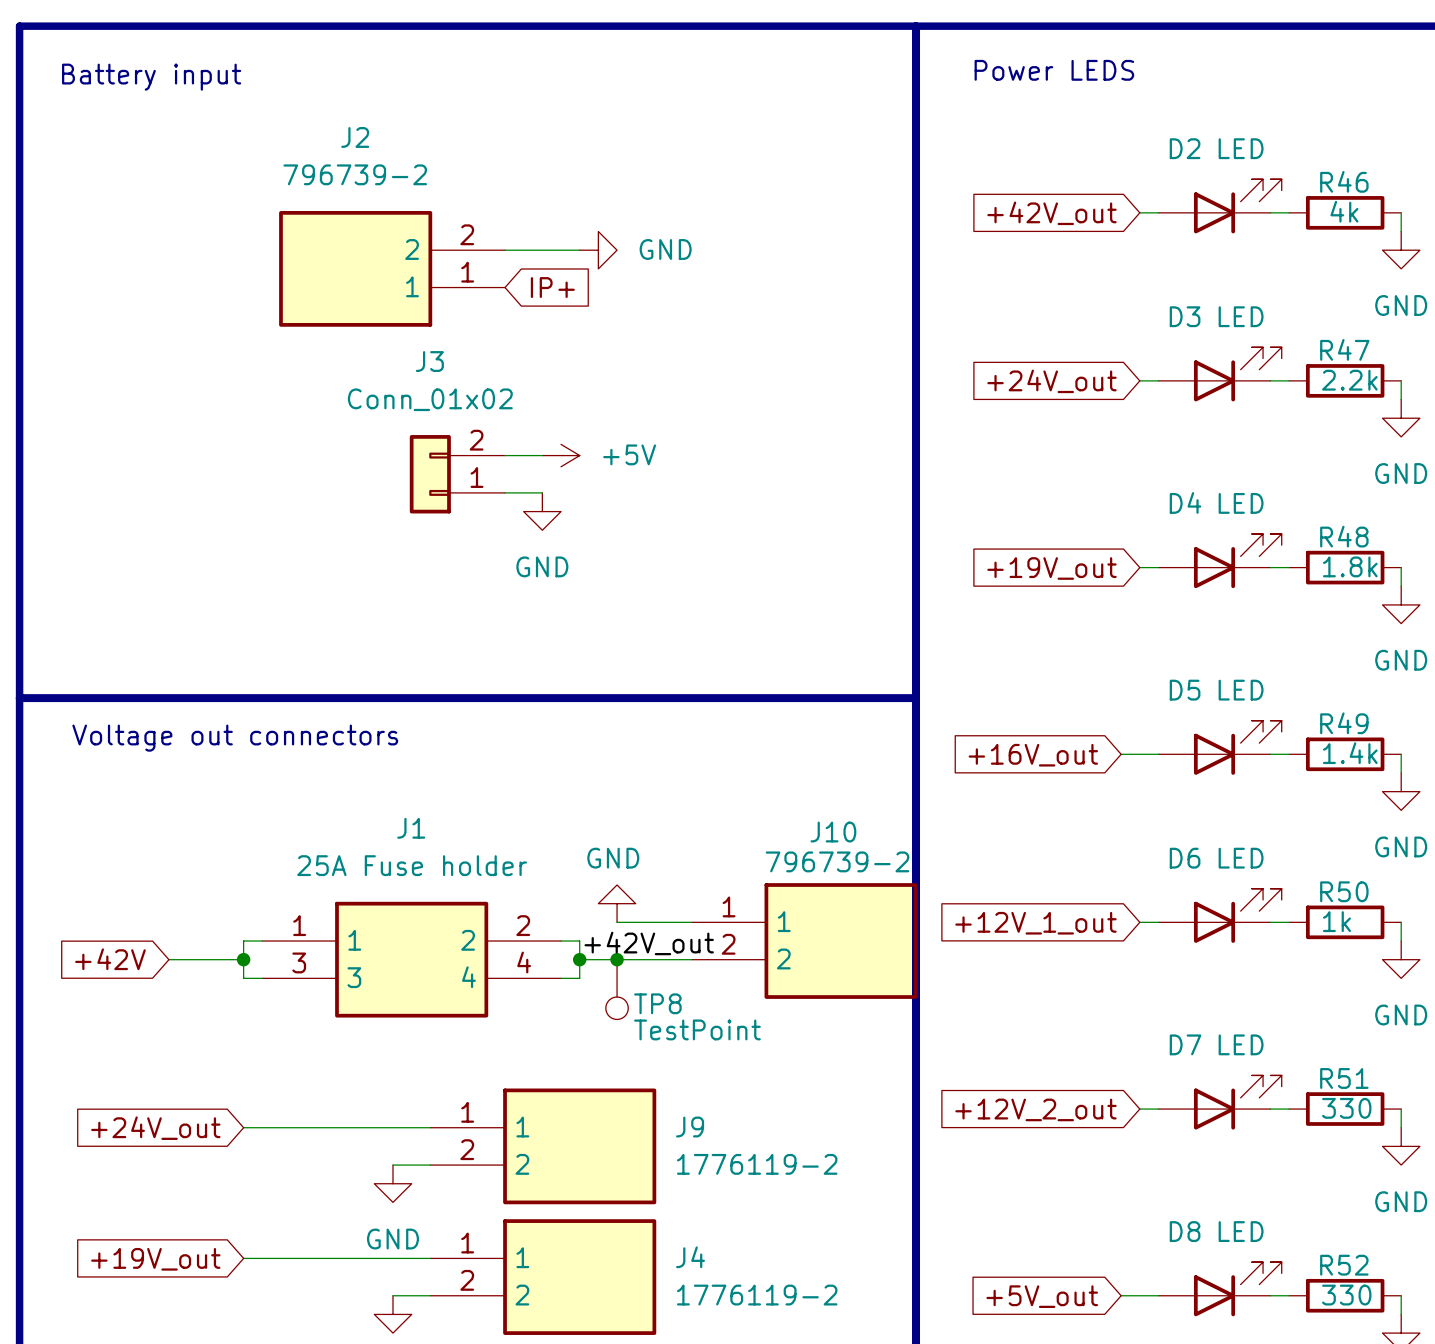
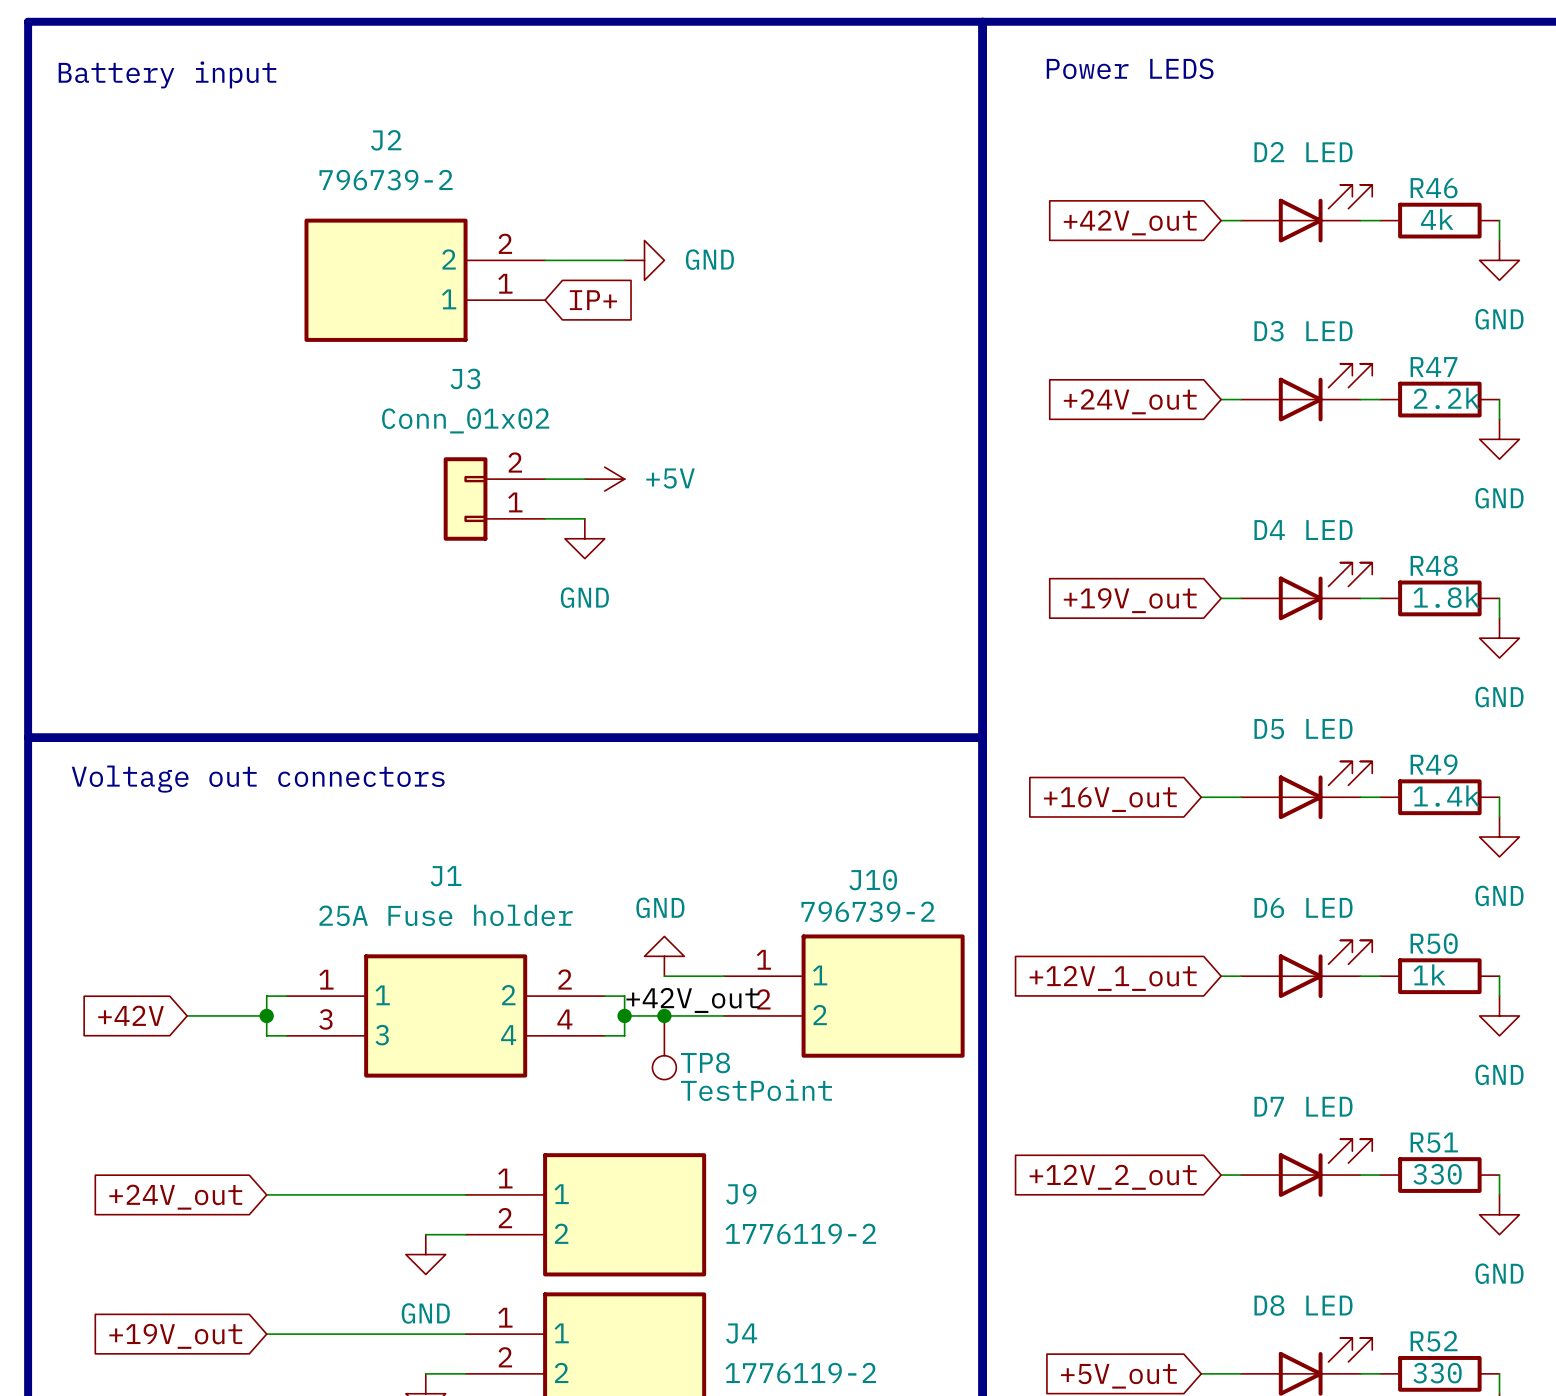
J10 position: (804, 941) -> (844, 996)

